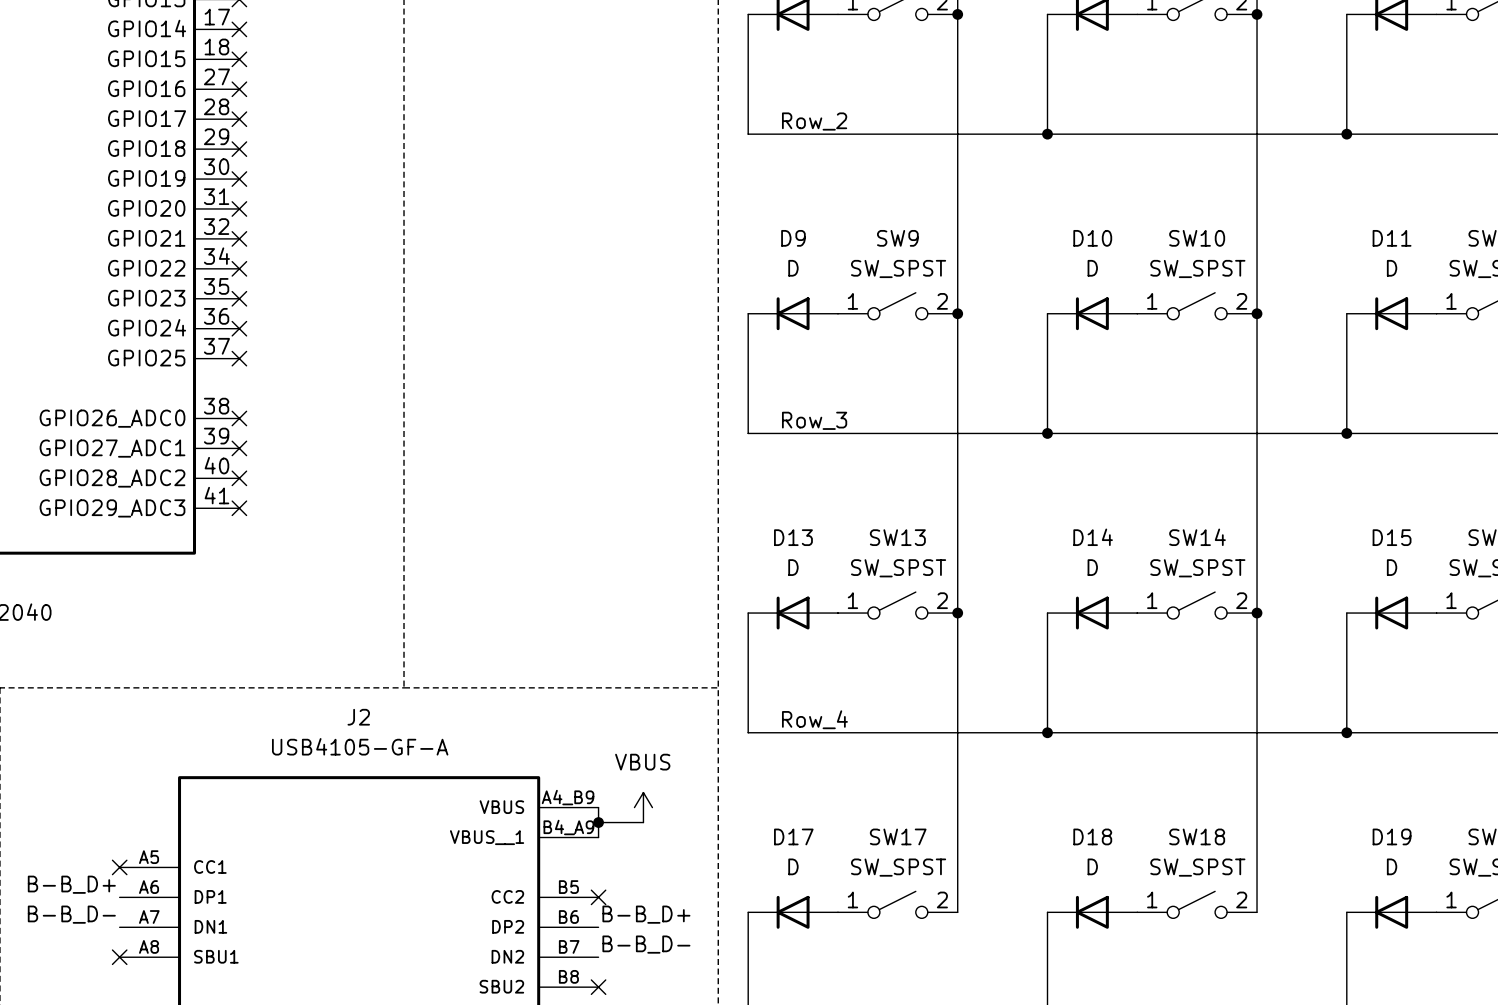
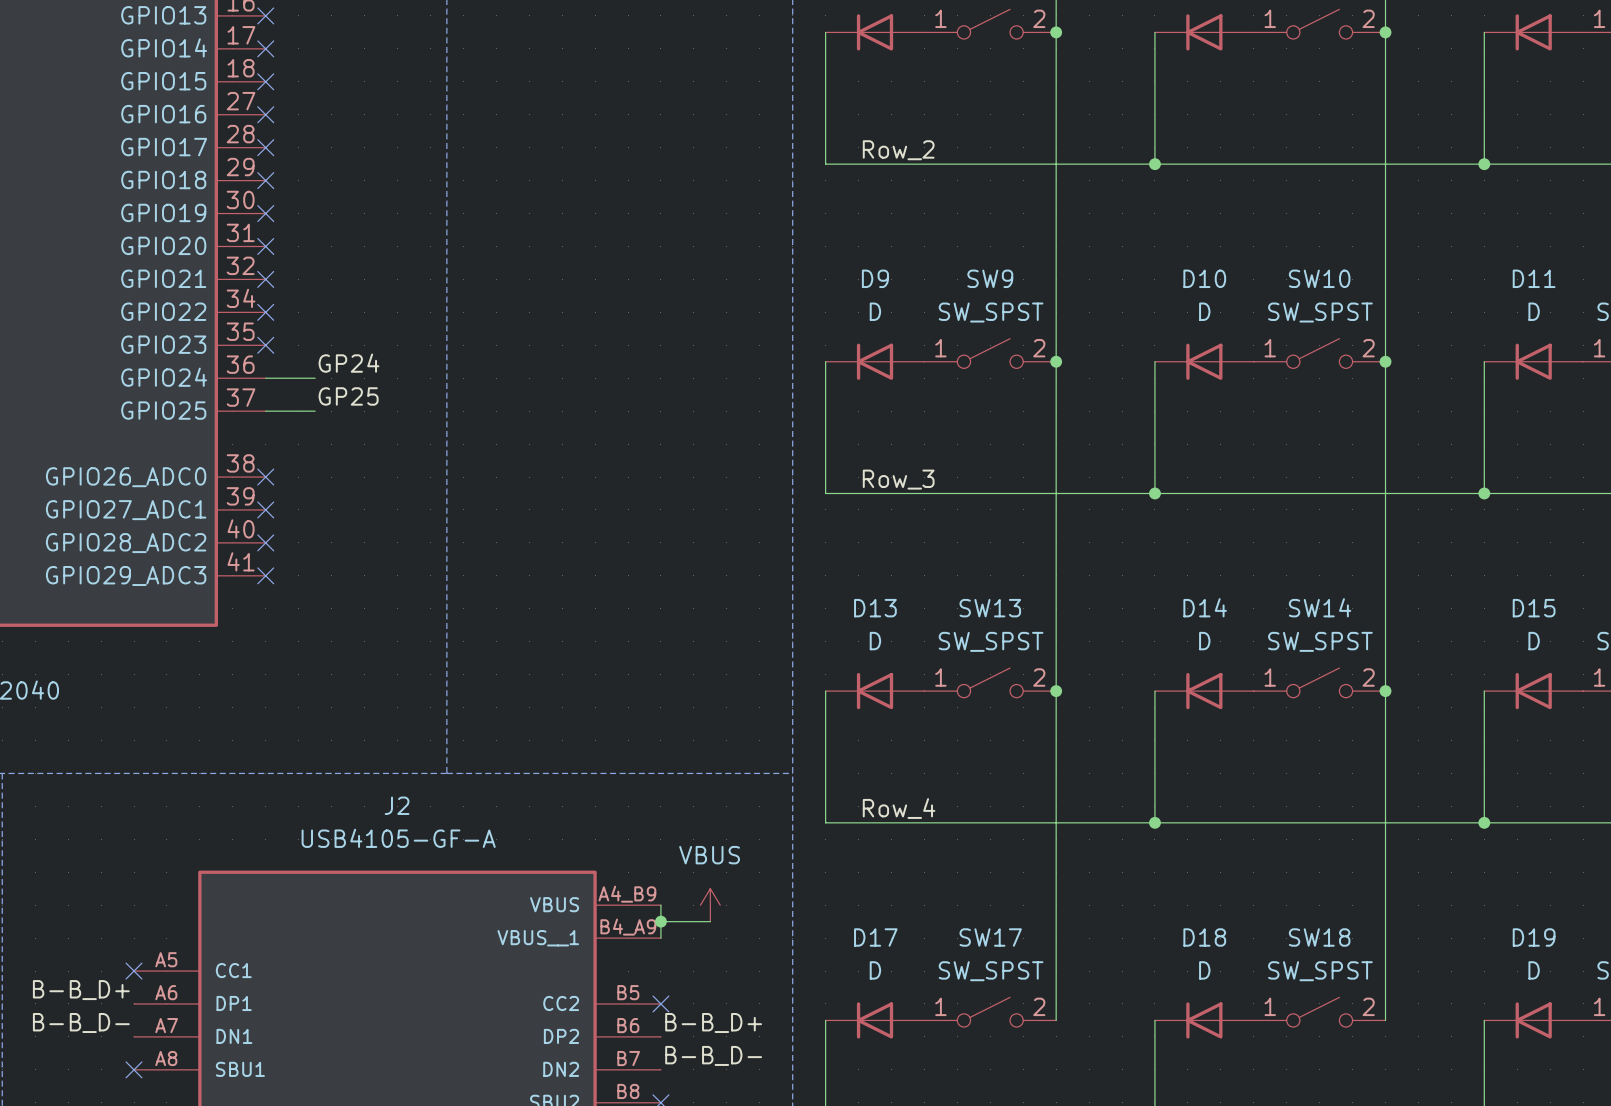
label: none -> GP24 (348, 363)
wire: none -> (265, 378) (315, 378)
no-connect mark: (239, 328) -> none
label: none -> GP25 (348, 396)
wire: none -> (265, 411) (315, 411)
no-connect mark: (239, 358) -> none

